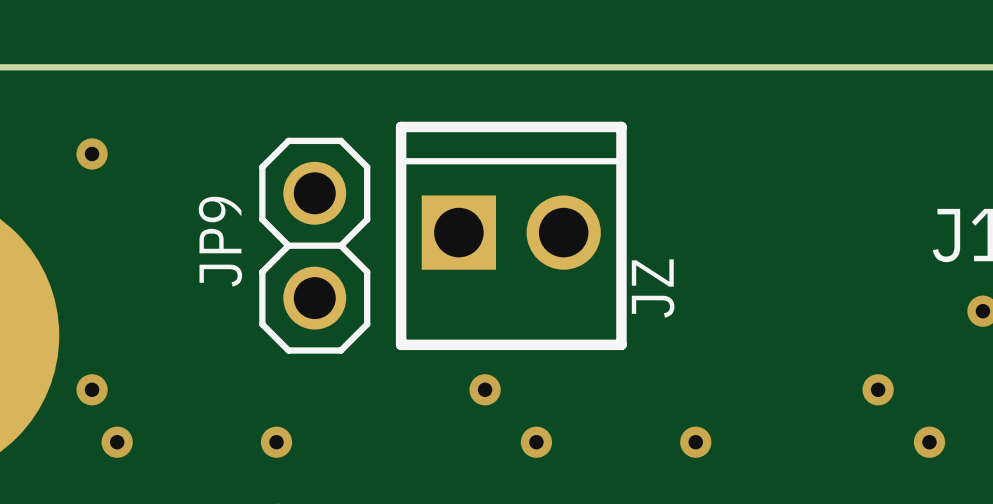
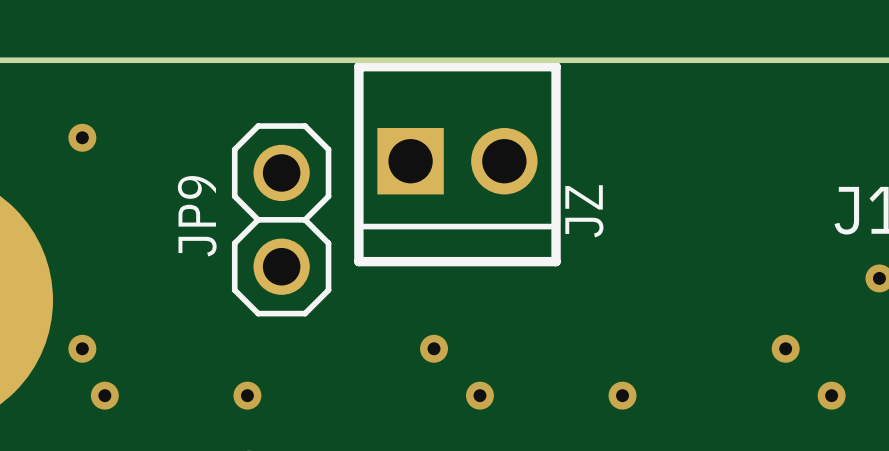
JZ: none -> (457, 164)
JZ: (511, 235) -> none

